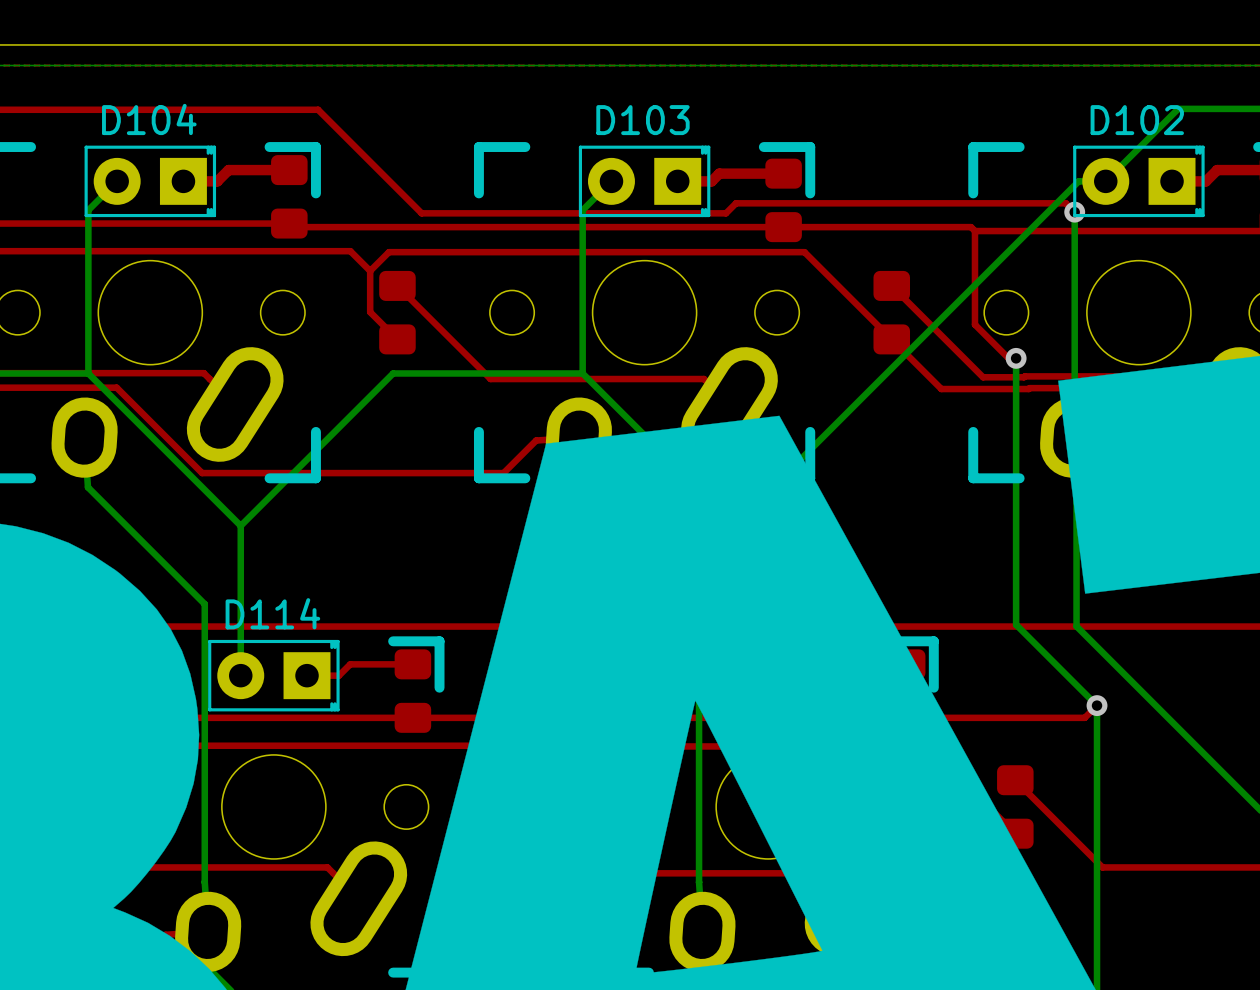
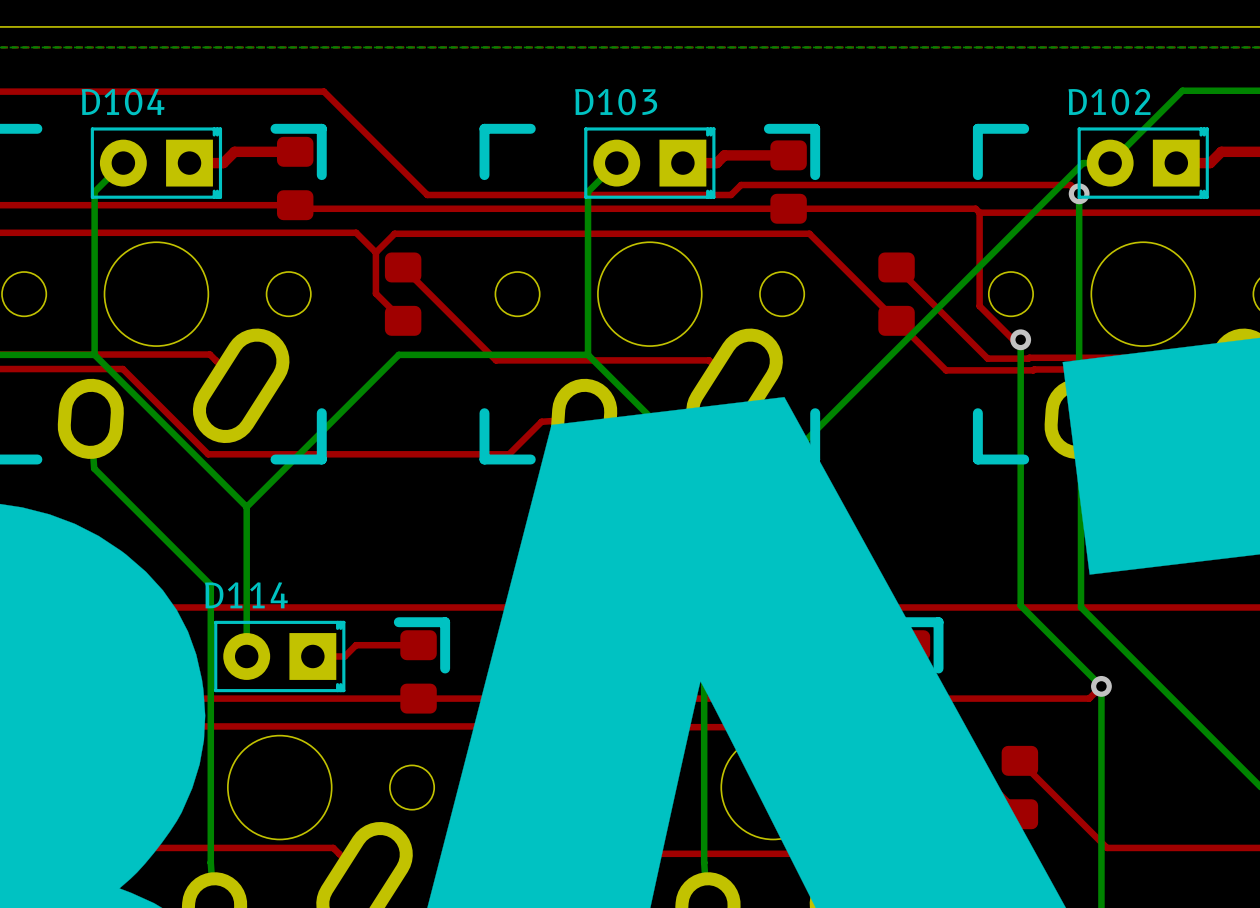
D104 name position: D104 (149, 119) -> D104 (123, 102)
D103 name position: D103 (642, 120) -> D103 (616, 102)
D102 name position: D102 (1137, 120) -> D102 (1109, 102)
D114 name position: D114 (272, 613) -> D114 (246, 595)

